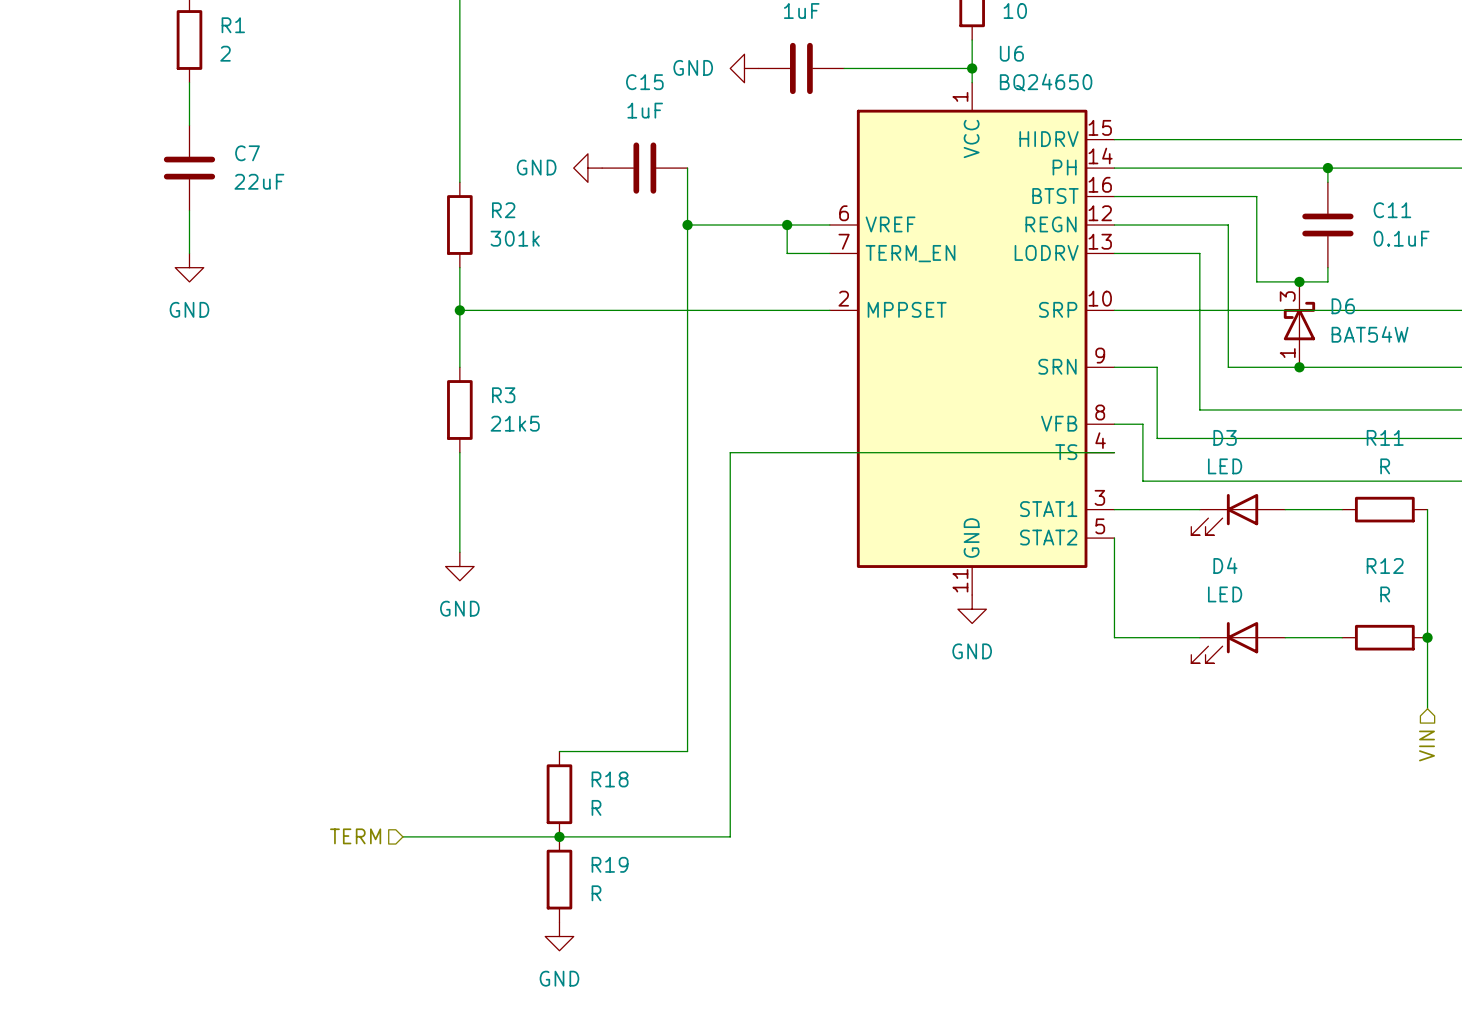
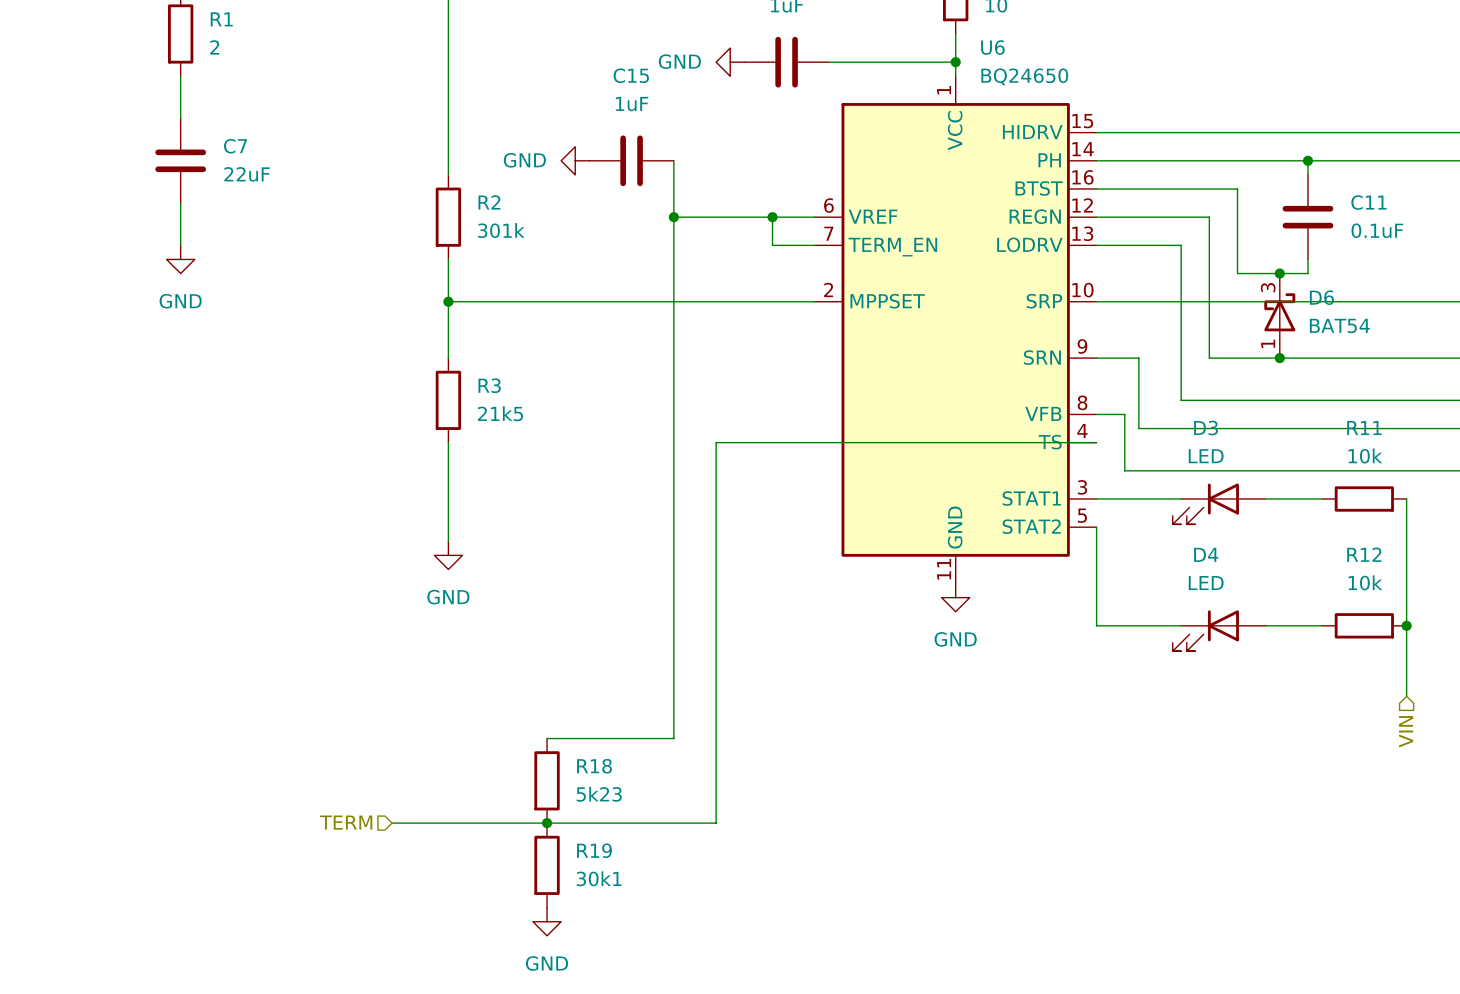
D6 value: BAT54W (1370, 334) -> BAT54 (1339, 325)
R11 value: R (1385, 466) -> 10k (1365, 456)
R12 value: R (1385, 594) -> 10k (1365, 582)
R18 value: R (596, 807) -> 5k23 (599, 794)
R19 value: R (596, 893) -> 30k1 (599, 878)

